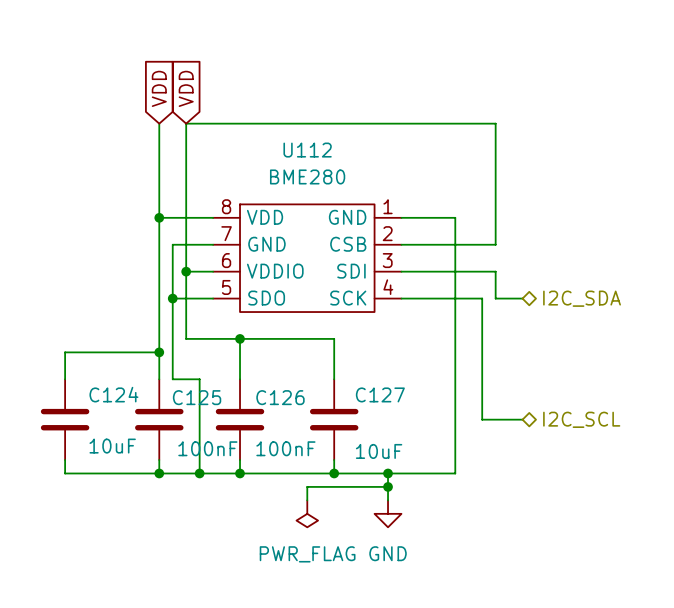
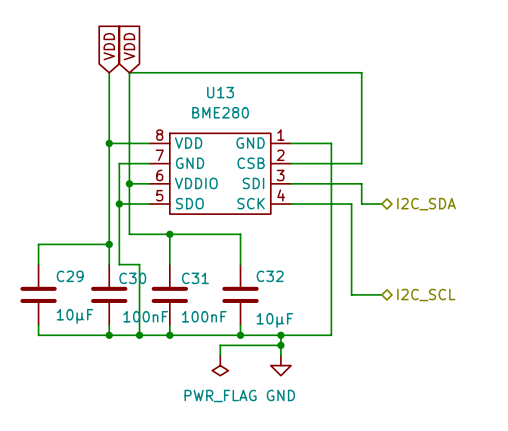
U112 name: U112 (307, 150) -> U13 (220, 92)
C124 name: C124 (113, 394) -> C29 (70, 276)
C127 name: C127 (380, 394) -> C32 (270, 276)
C125 name: C125 (197, 397) -> C30 (132, 278)
C126 name: C126 (280, 397) -> C31 (195, 278)
C124 value: 10uF (112, 446) -> 10μF (74, 316)
C127 value: 10uF (379, 451) -> 10μF (274, 320)

